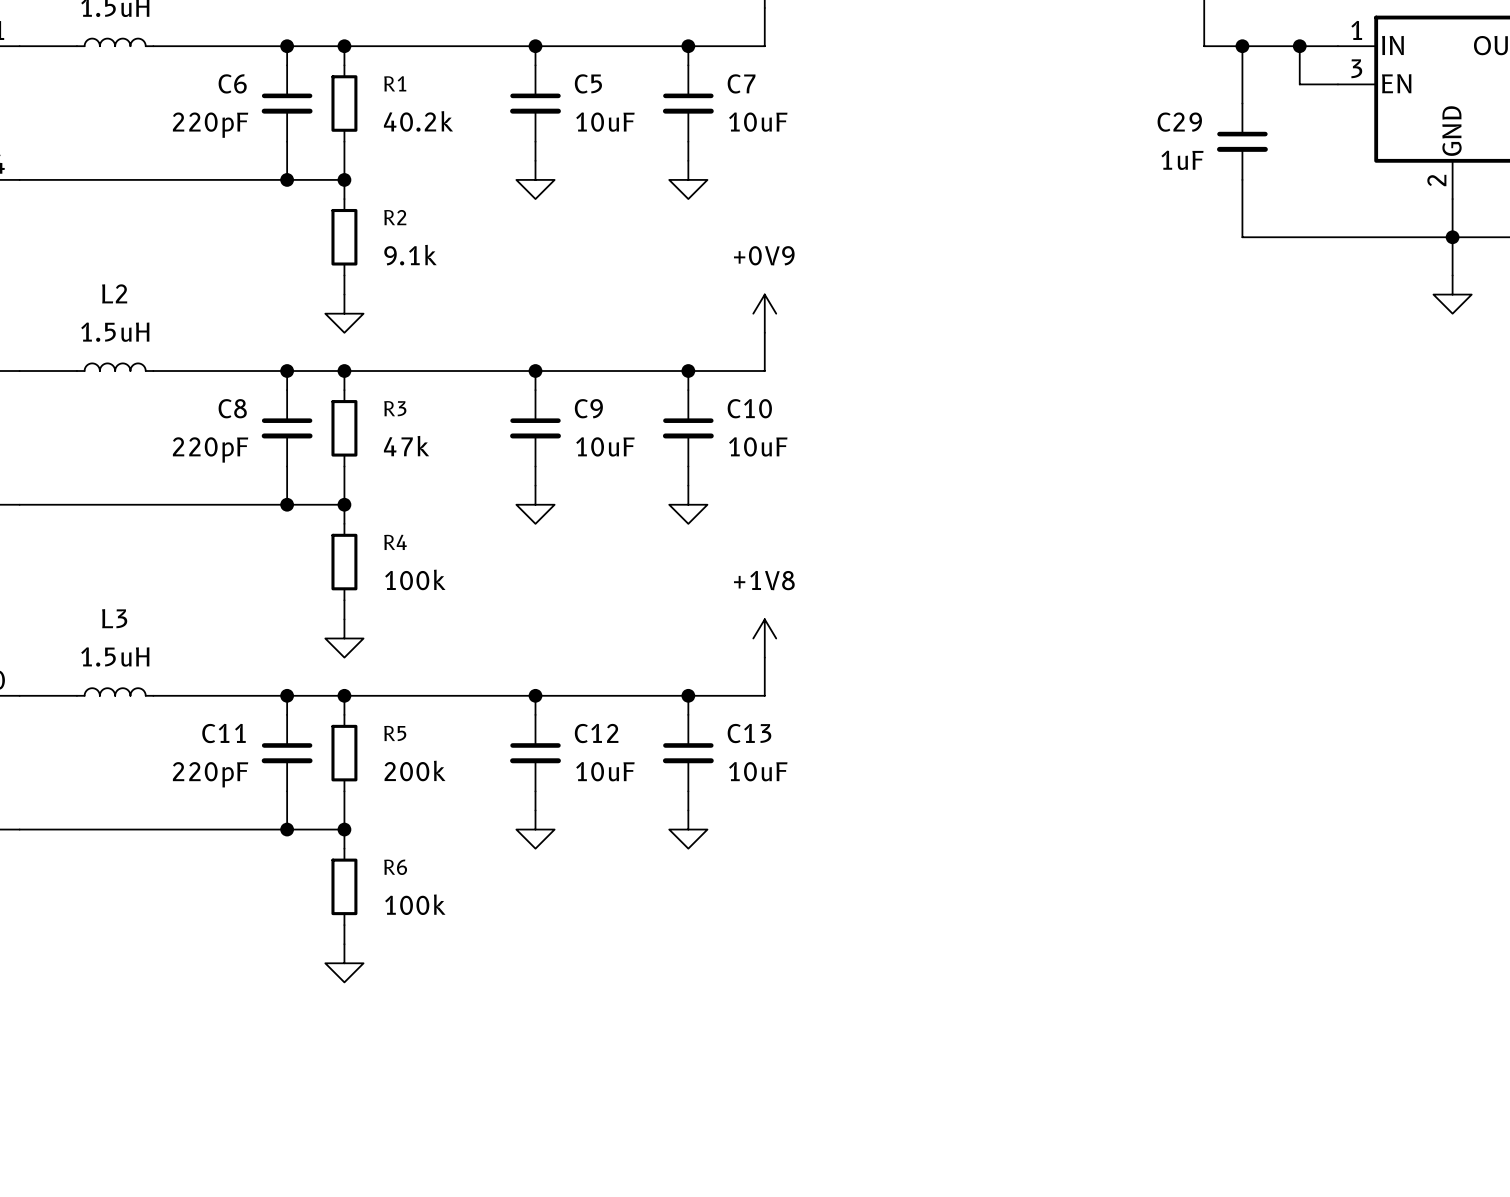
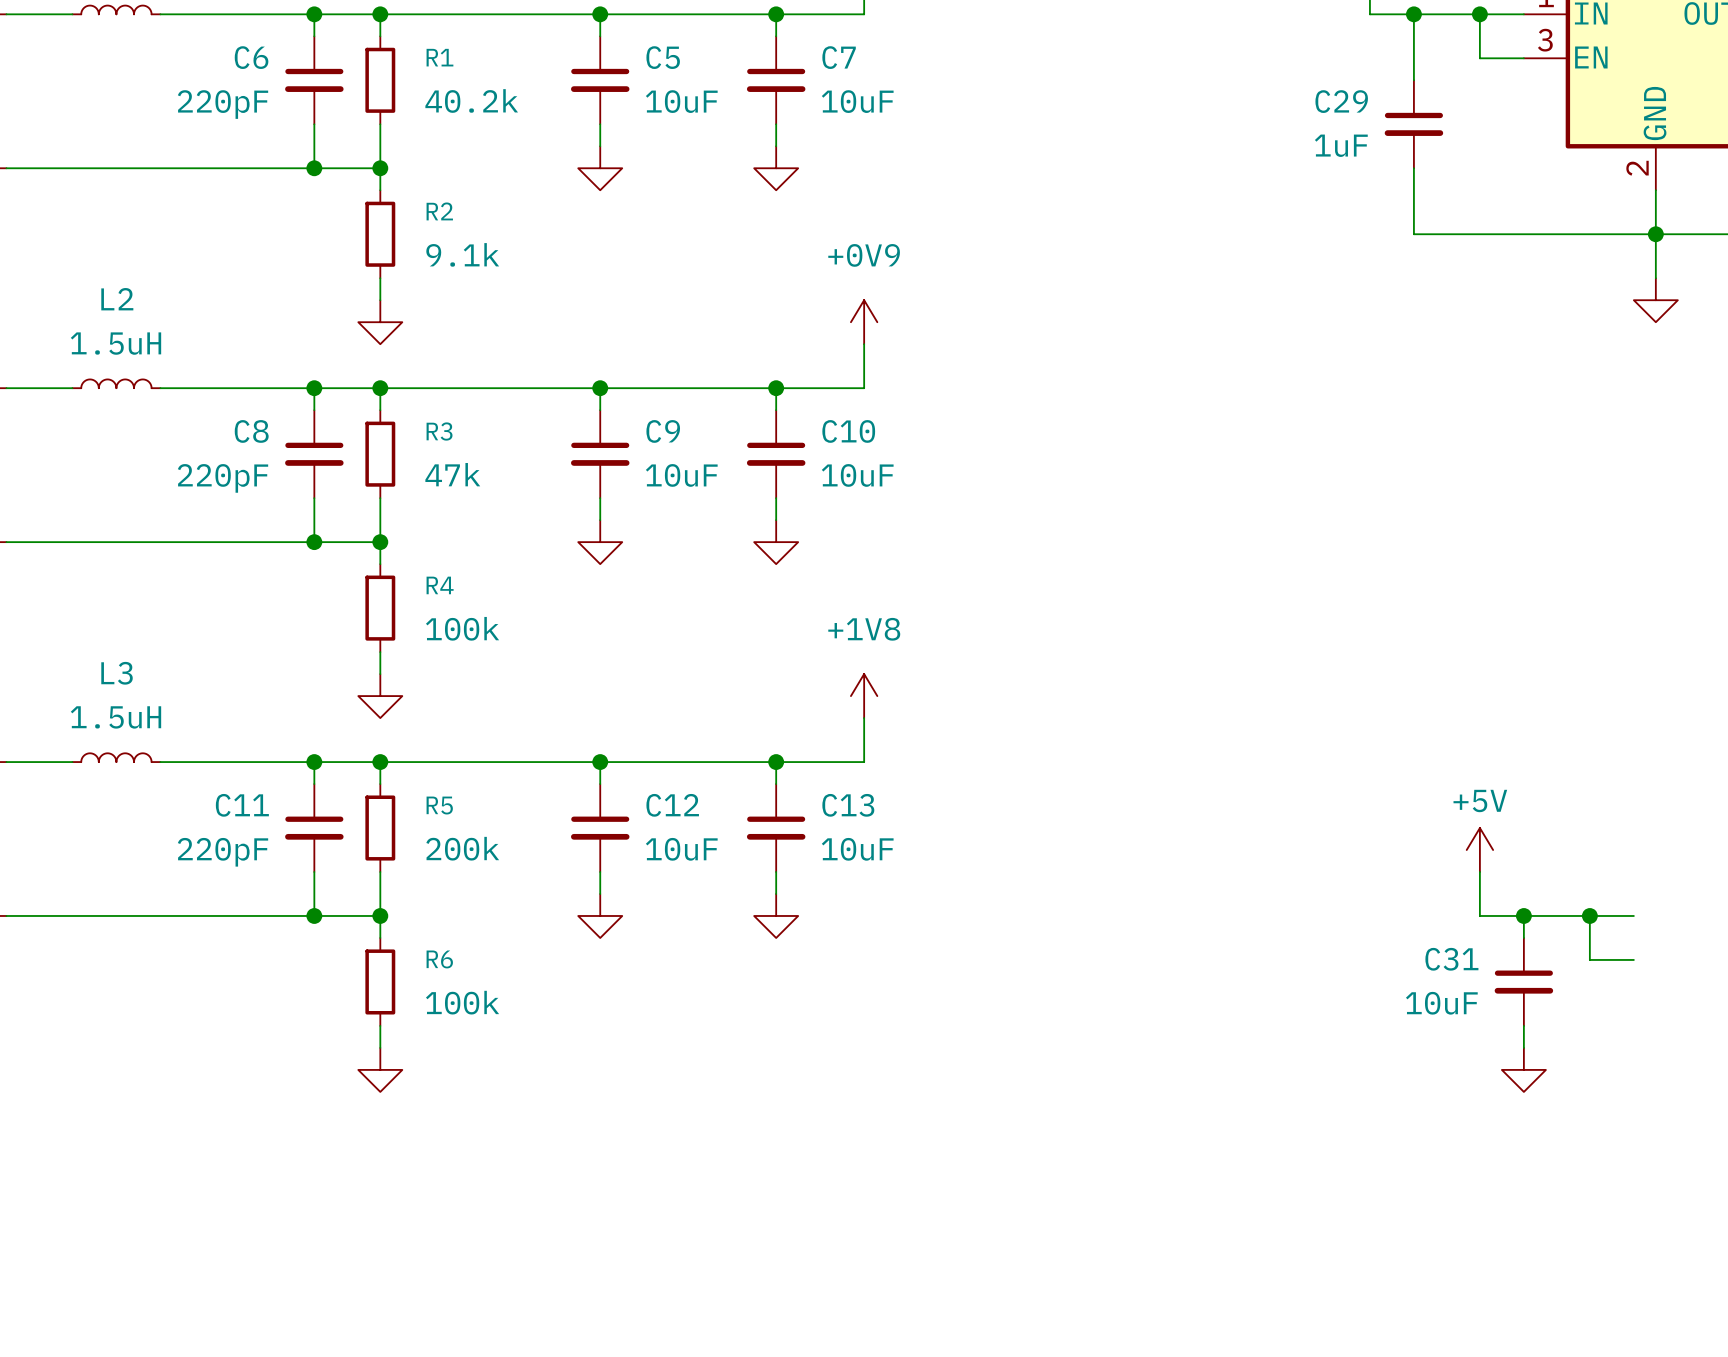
power symbol: none -> +5V (1479, 850)
wire: none -> (1479, 872) (1479, 915) (1633, 915)
wire: none -> (1523, 915) (1523, 937)
junction: none -> (1523, 915)
wire: none -> (1589, 915) (1589, 959) (1633, 959)
junction: none -> (1589, 915)
C31: none -> 10uF (1523, 981)
wire: none -> (1523, 1025) (1523, 1047)
power symbol: none -> (1523, 1069)

